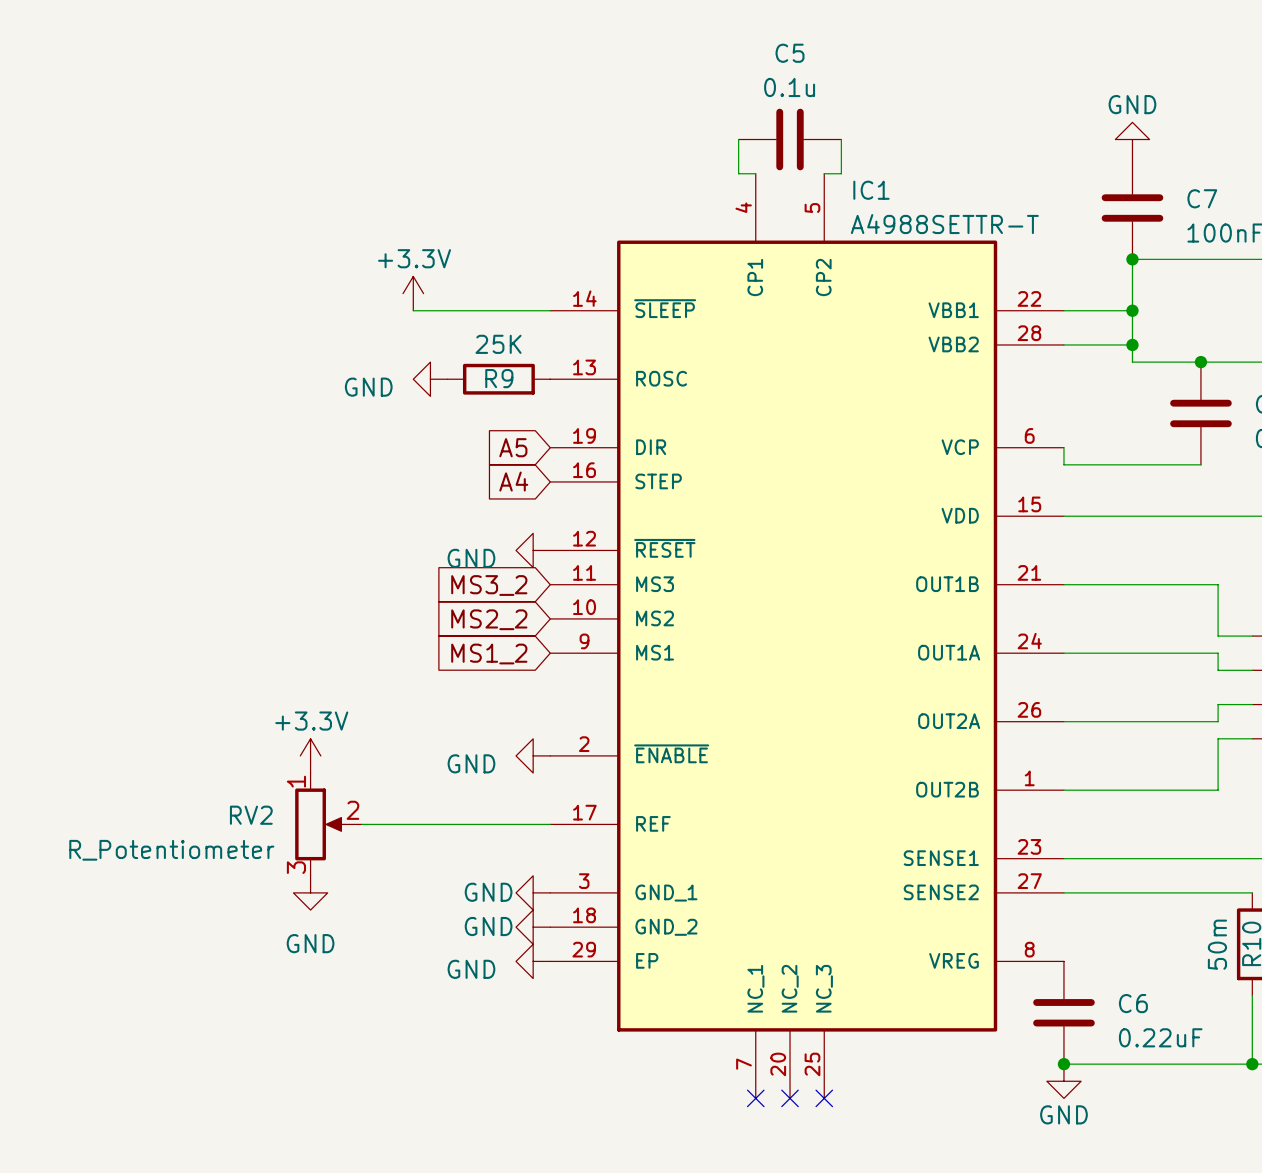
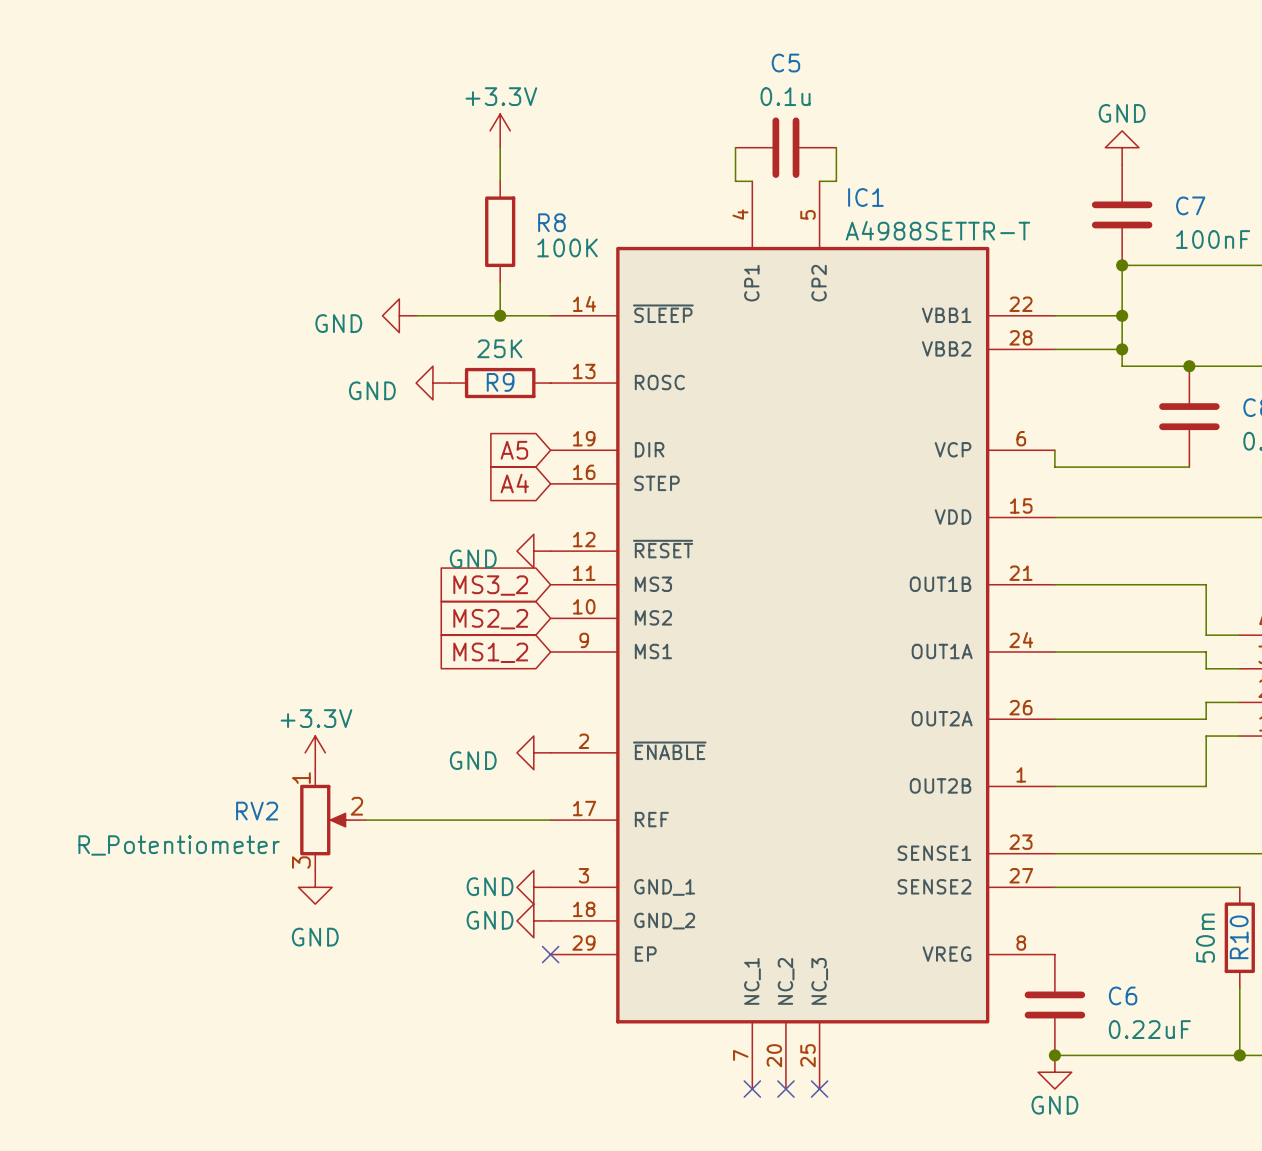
wire: none -> (500, 147) (500, 181)
R8: none -> 100K (500, 231)
wire: none -> (500, 282) (500, 315)
power symbol position: +3.3V (413, 293) -> +3.3V (500, 130)
power symbol: none -> GND (399, 315)
junction: none -> (500, 315)
power symbol: GND (533, 961) -> none
no-connect mark: none -> (550, 954)

